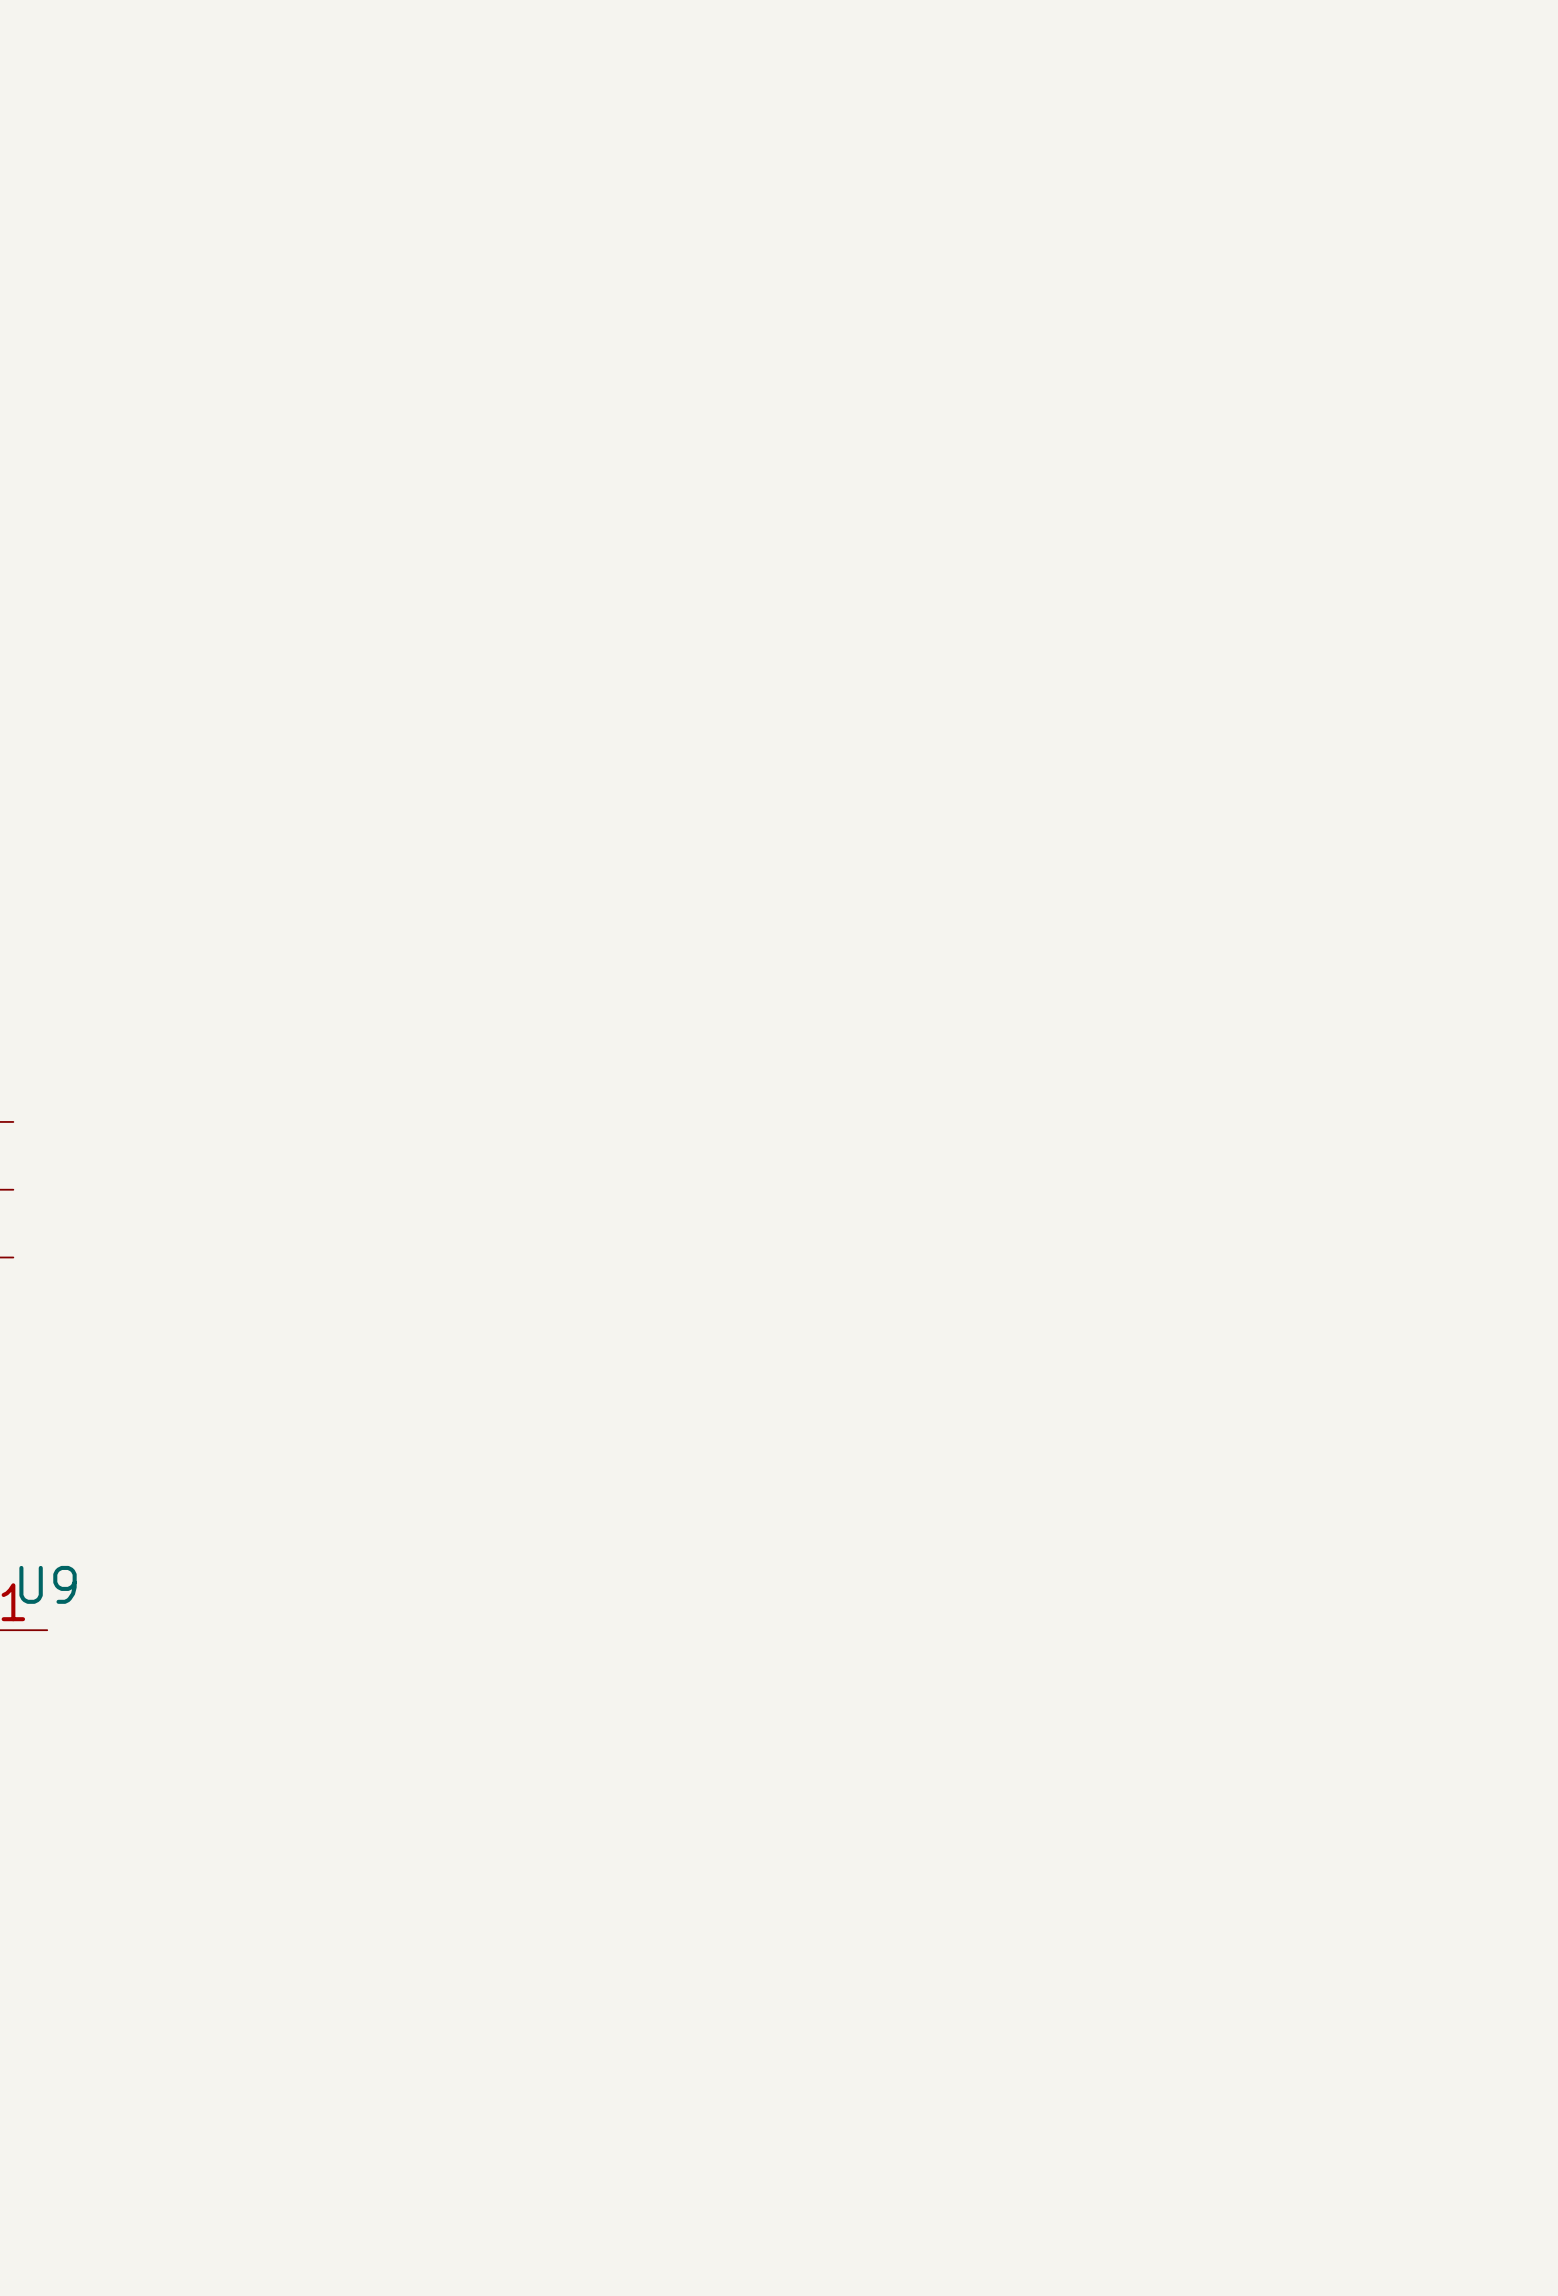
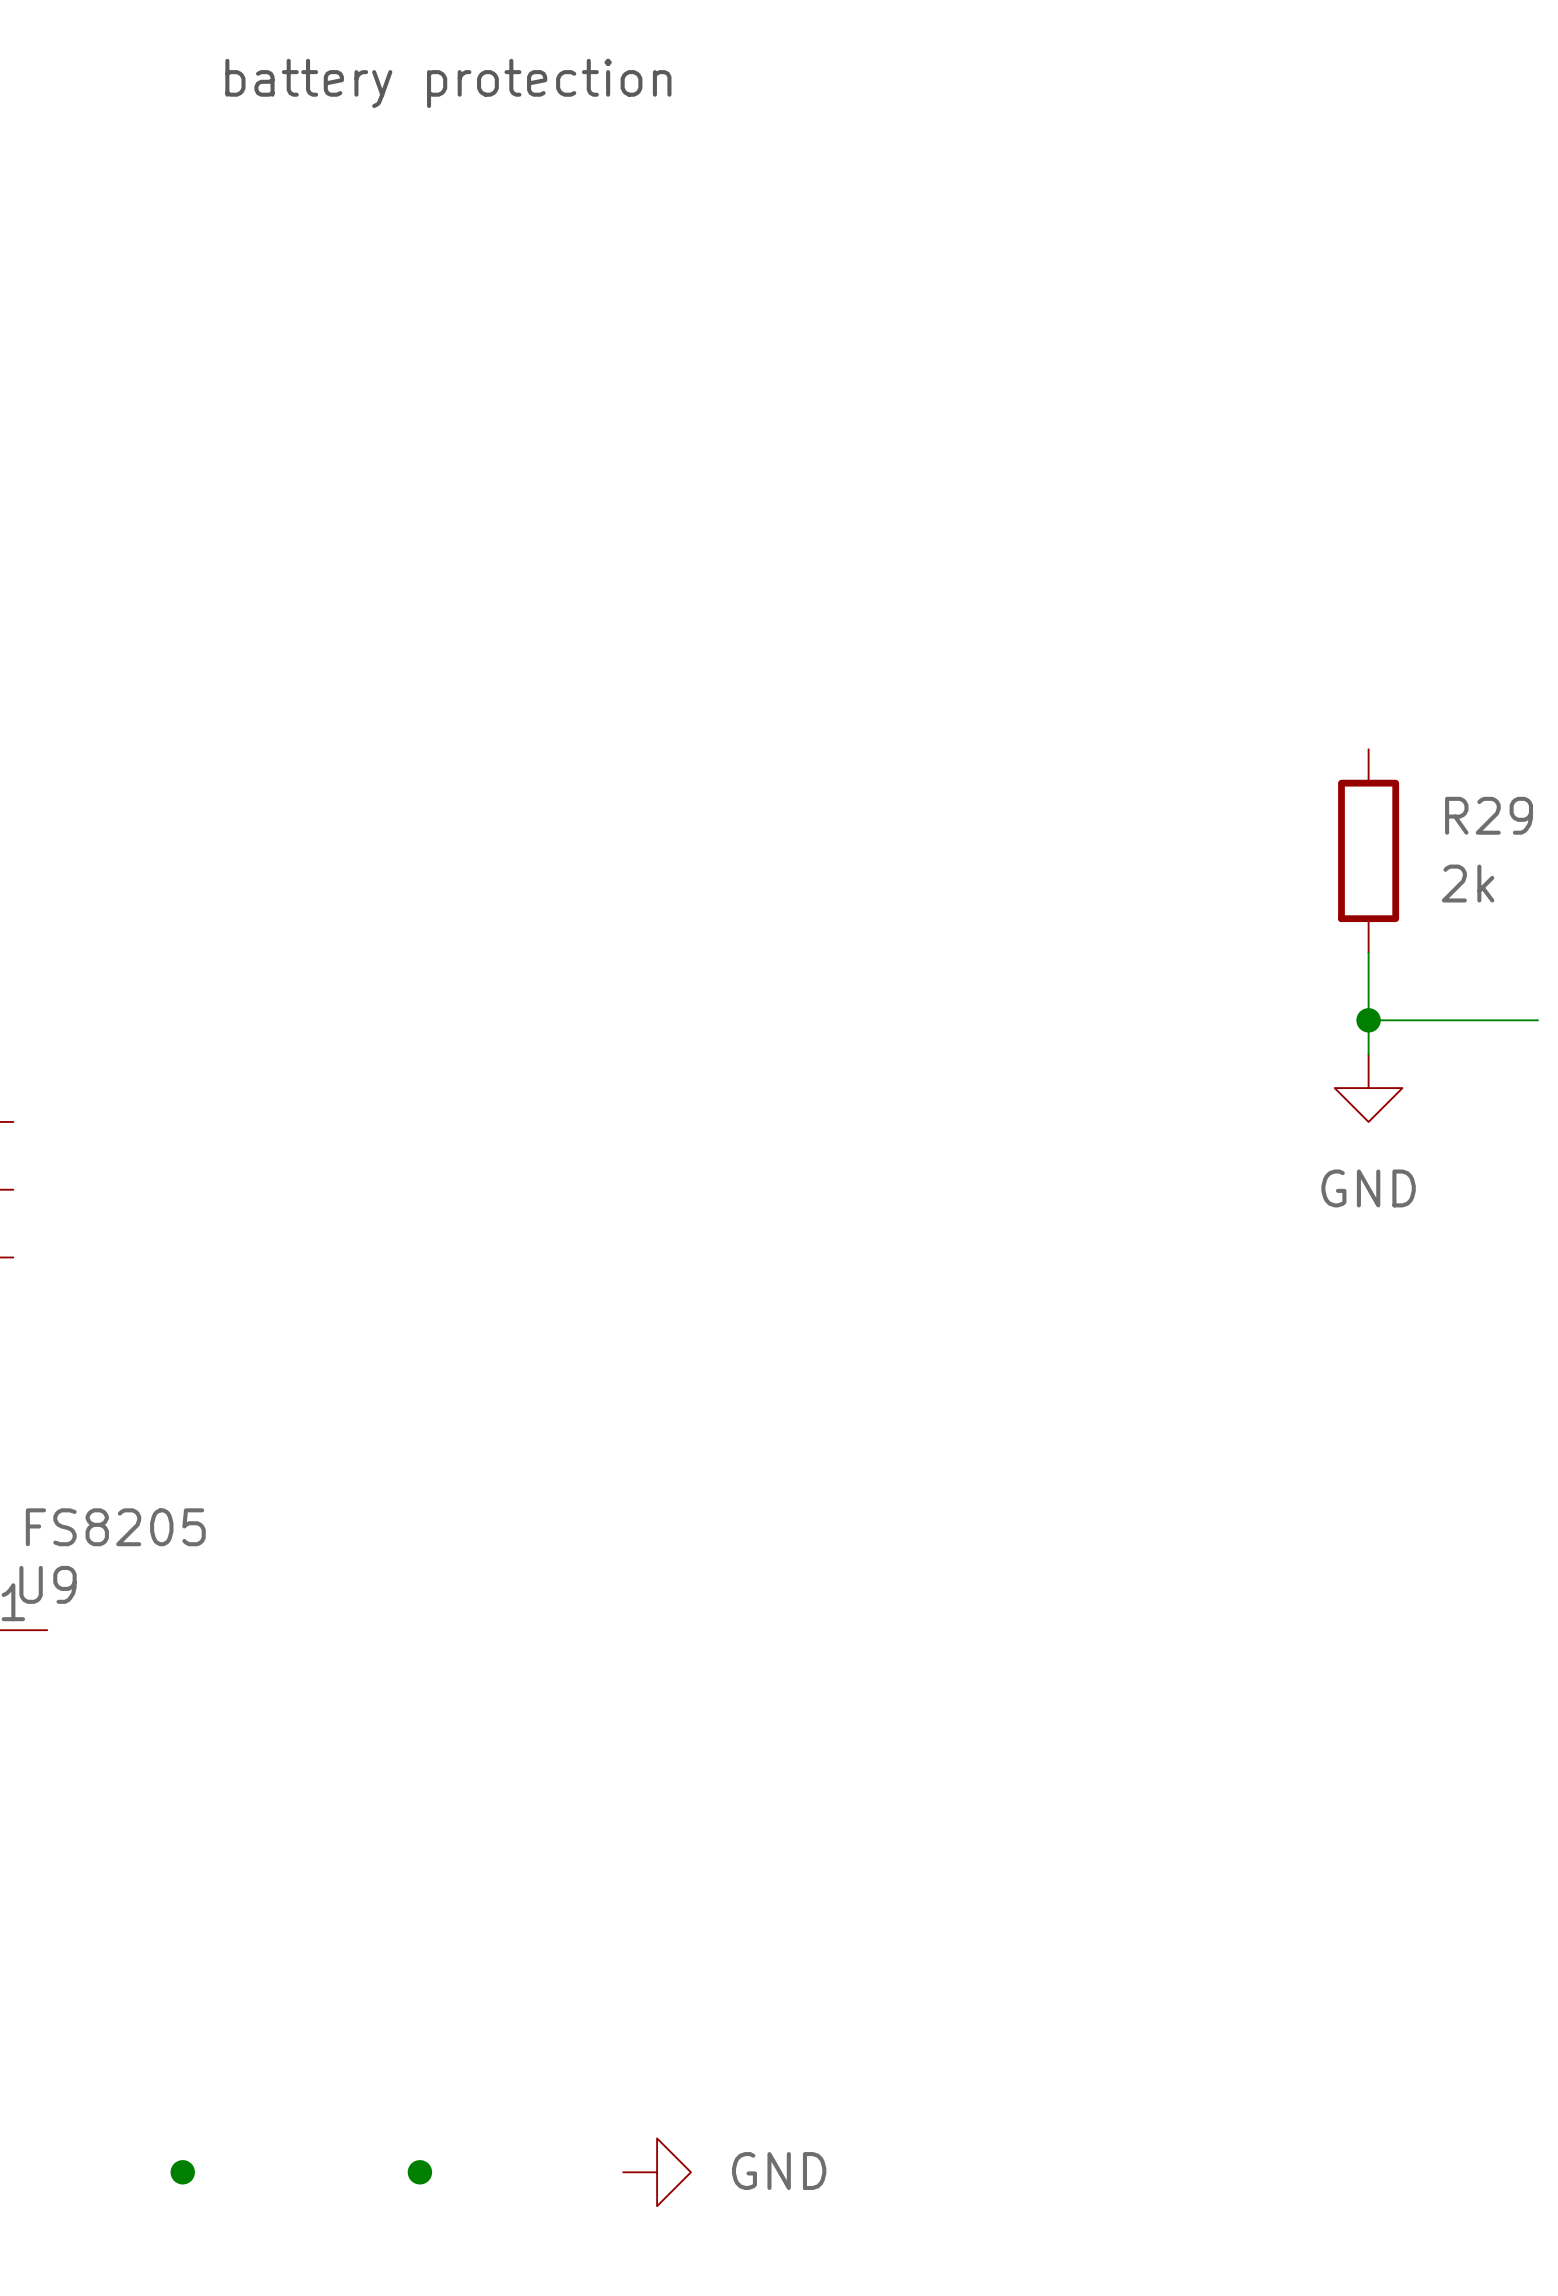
text: none -> battery protection (448, 83)
R29: none -> 2k (1368, 850)
wire: none -> (1368, 952) (1368, 1054)
wire: none -> (1368, 1020) (1538, 1020)
junction: none -> (1368, 1020)
power symbol: none -> GND (1368, 1088)
U9 value: none -> FS8205 (115, 1527)
junction: none -> (182, 2172)
junction: none -> (419, 2172)
power symbol: none -> GND (657, 2172)

